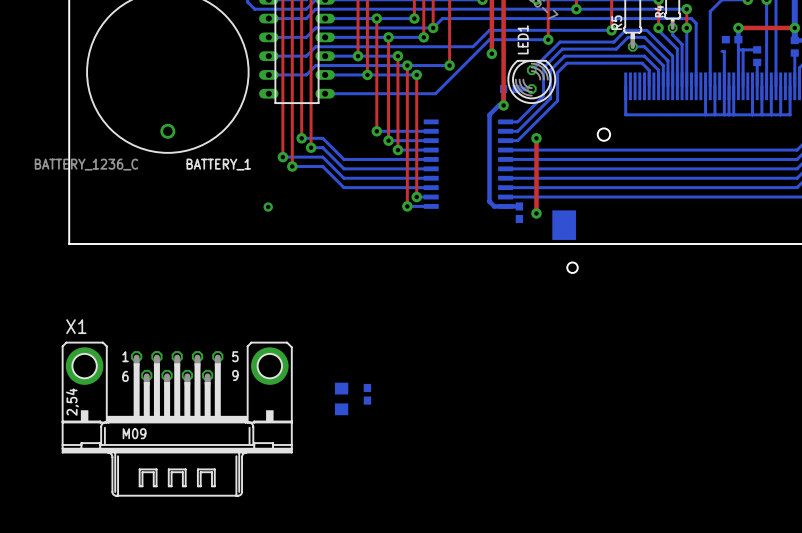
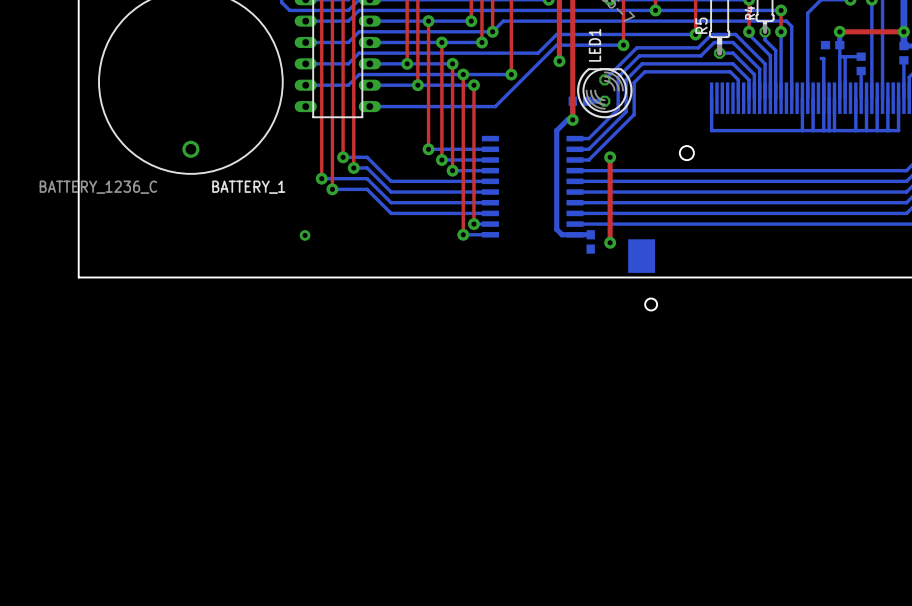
part: (367, 394) -> none
part: (341, 398) -> none
X1: (177, 419) -> none

